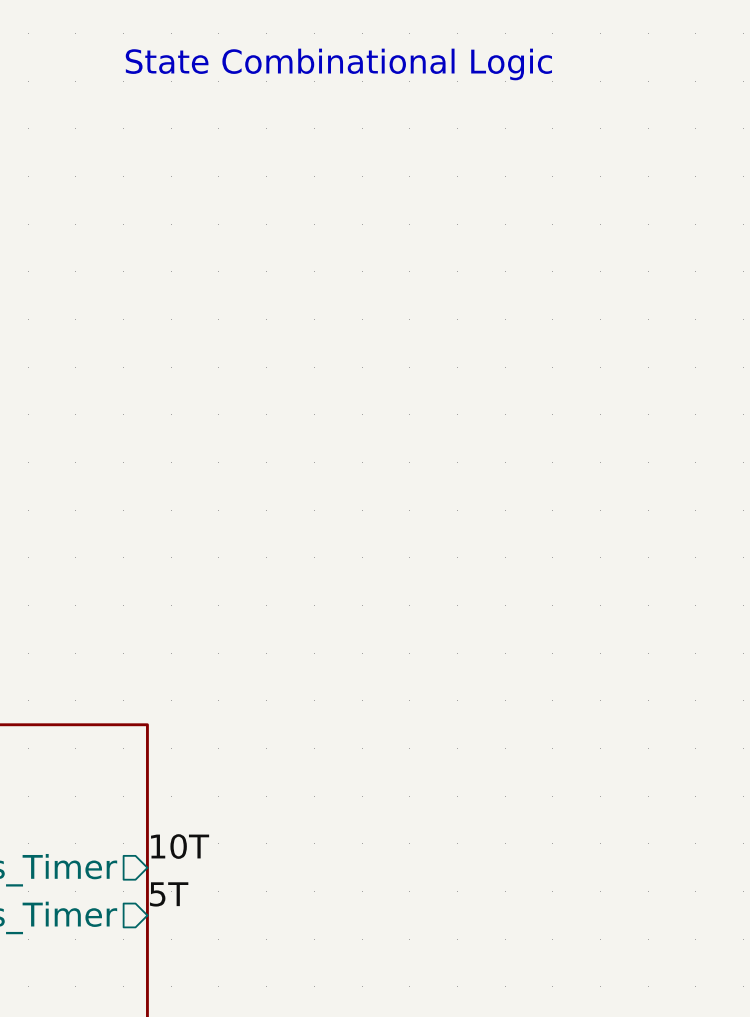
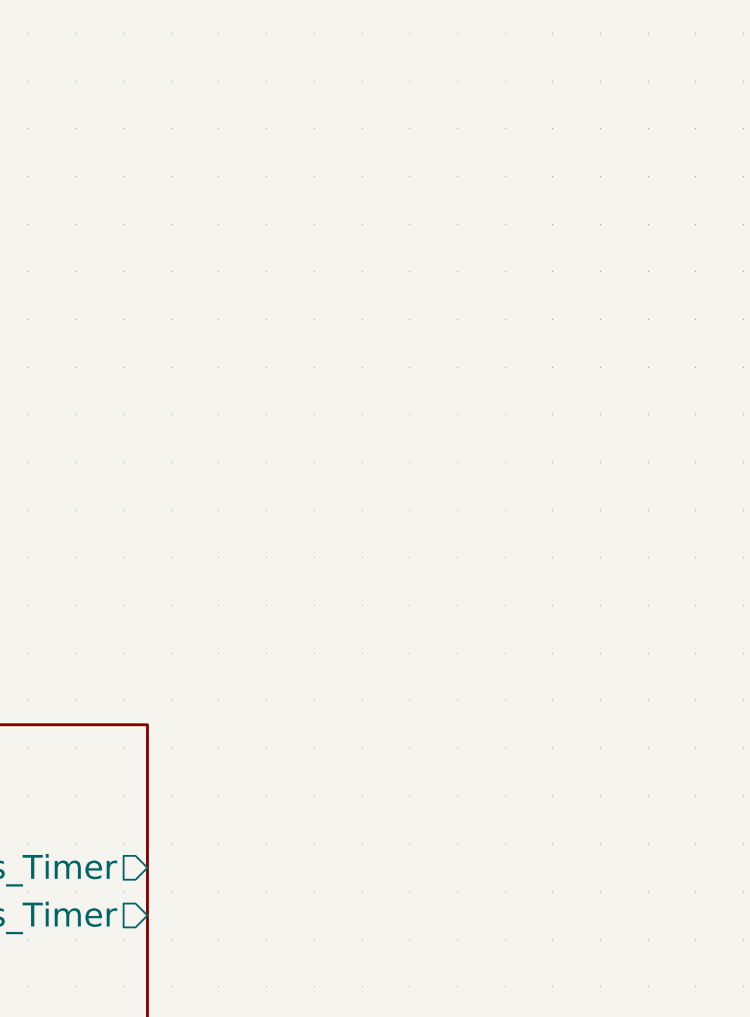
text: State Combinational Logic (338, 64) -> none
label: 10T (180, 846) -> none
label: 5T (169, 894) -> none

